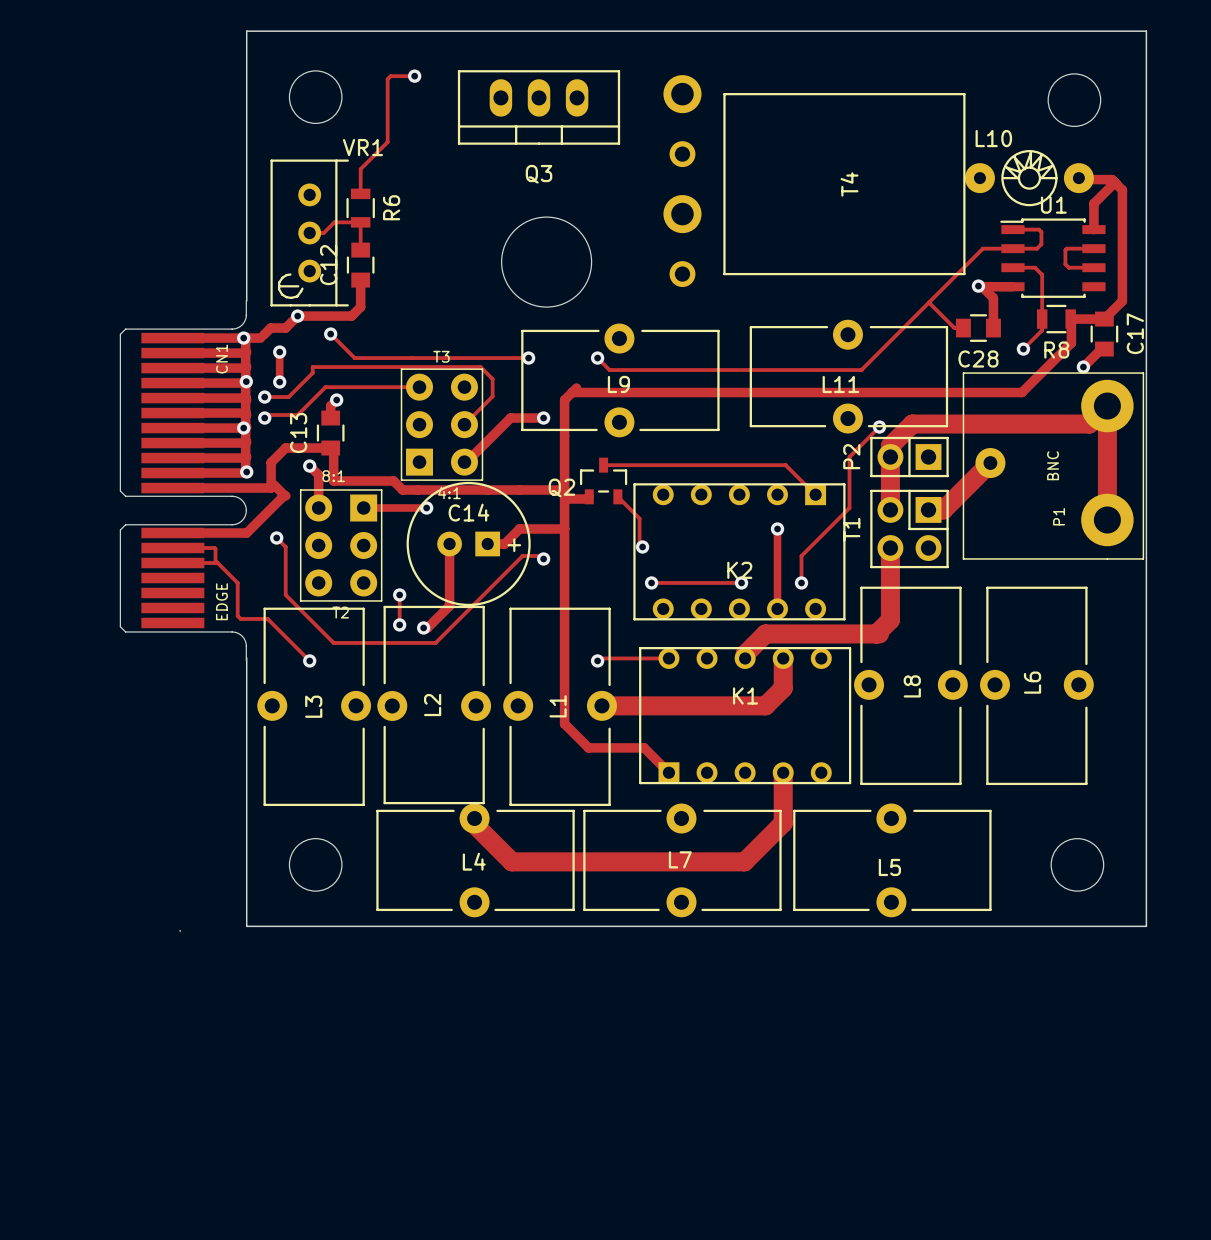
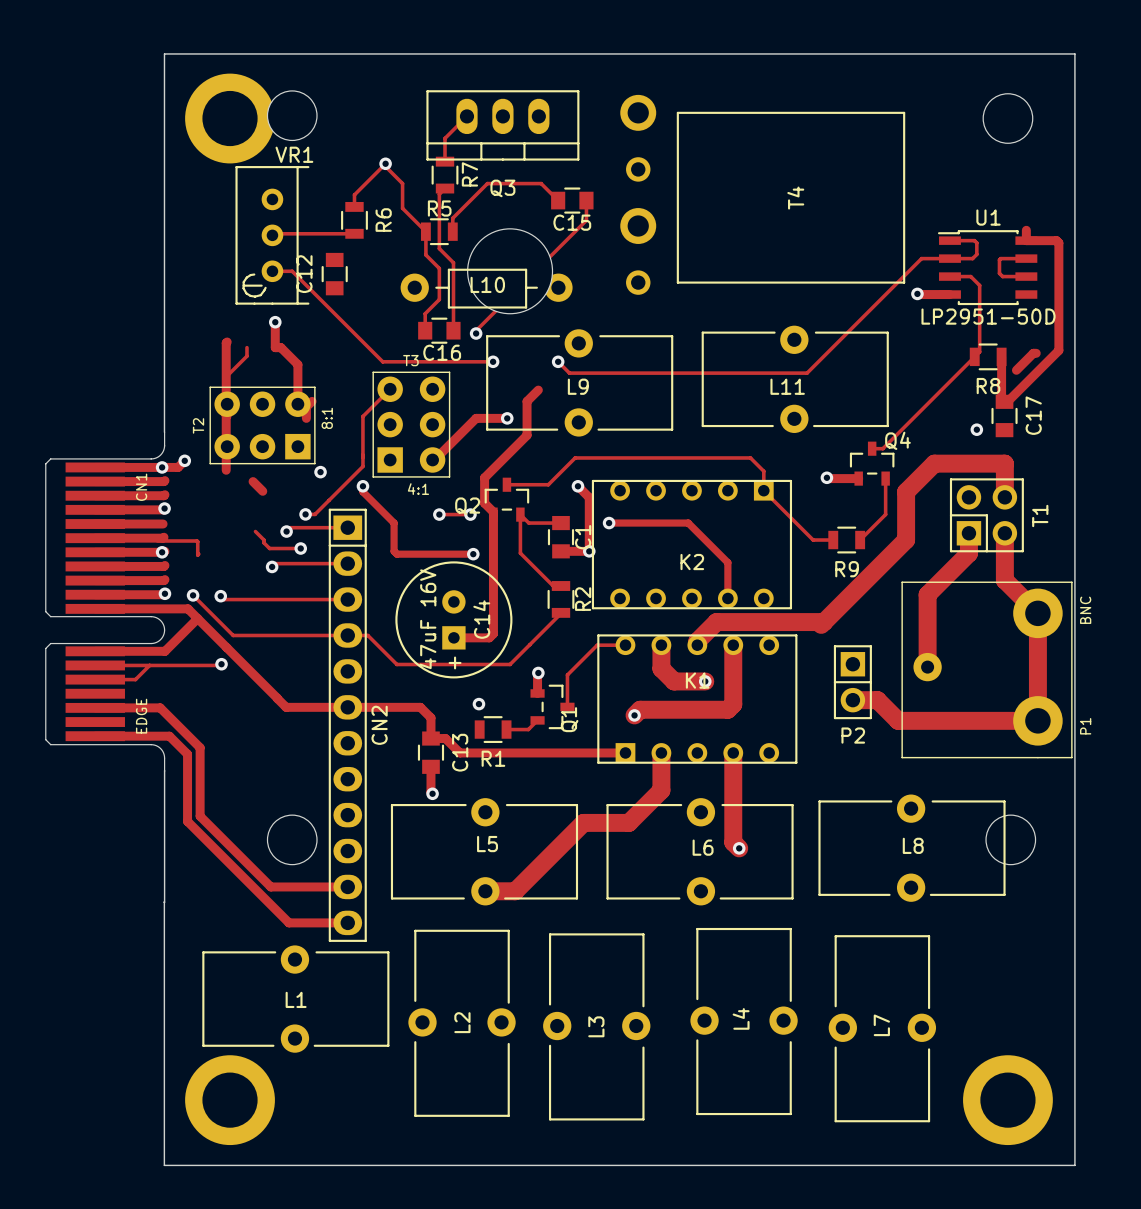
track: (414, 76) (390, 76) (387, 79) (387, 142) (360, 169) (360, 193) -> none
via position: (414, 76) -> (385, 163)
track: none -> (466, 116) (445, 138) (445, 161)
part: none -> (230, 118)
L10 name position: L10 (993, 138) -> L10 (487, 284)
VR1 name position: VR1 (362, 147) -> VR1 (294, 154)
L10 footprint: [964, 149, 1094, 207] -> [400, 268, 573, 309]
R7: none -> (445, 175)
track: none -> (445, 188) (439, 194) (439, 248) (453, 262) (453, 330)
track: (1078, 178) (1111, 179) (1122, 190) (1122, 301) (1104, 319) (1070, 319) (1071, 343) (1021, 392) (572, 392) -> none
track: (1116, 184) (1113, 184) (1093, 203) (1093, 218) -> none
track: none -> (558, 200) (541, 183) (487, 183) (452, 218) (452, 231)
C15: none -> (572, 200)
track: none -> (586, 200) (586, 220) (476, 330) (476, 333)
track: none -> (354, 206) (354, 194) (385, 163) (385, 166) (402, 183) (402, 208) (425, 231) (425, 255) (439, 268) (439, 299) (425, 313) (425, 330)
R6 position: (360, 208) -> (354, 220)
R5: none -> (439, 231)
track: (334, 222) (323, 233) (309, 233) -> (309, 233) (272, 235)
track: (360, 222) (360, 250) -> (334, 233) (354, 233)
track: none -> (1026, 240) (1056, 240) (1058, 242) (1058, 350) (1007, 401) (1001, 398) (1001, 356)
VR1 position: (309, 233) -> (272, 235)
track: (1042, 274) (1042, 330) (1023, 349) -> (977, 283) (979, 285) (979, 351) (882, 448) (872, 448)
track: (360, 280) (360, 307) (351, 316) (297, 316) (285, 328) (270, 328) (263, 335) -> none
track: (978, 286) (981, 286) (993, 298) (993, 328) -> none
board edge: (246, 301) (246, 31) (1146, 31) (1146, 926) (246, 926) (246, 657) -> none
track: (928, 302) (954, 328) (963, 328) -> none
U1 value: none -> LP2951-50D (988, 316)
track: none -> (275, 322) (275, 347) (280, 347) (297, 364) (297, 404)
R8 position: (1056, 319) -> (988, 356)
C16: none -> (439, 330)
via: none -> (476, 333)
C28: (978, 328) -> none
track: (330, 334) (354, 358) (411, 358) -> (272, 271) (292, 271) (382, 361)
via: (330, 334) -> none
C17 position: (1104, 334) -> (1004, 415)
track: (172, 338) (260, 338) -> none
via: (243, 338) -> none
track: none -> (246, 347) (246, 356) (227, 375) (227, 404)
via: (1023, 349) -> none
track: (246, 352) (172, 353) -> (164, 480) (95, 481)
track: (279, 352) (279, 382) -> none
via: (279, 352) -> none
track: (246, 367) (172, 368) -> (164, 494) (95, 495)
via: (1083, 367) -> none
track: (246, 381) (172, 383) -> (164, 508) (95, 509)
via: (246, 381) -> none
via: (279, 382) -> none
track: (419, 387) (325, 387) (297, 415) (267, 415) (264, 418) -> (390, 389) (362, 416) (362, 466) (315, 514) (305, 514)
track: (264, 397) (288, 397) (312, 373) (312, 367) (480, 367) (492, 379) (492, 396) (464, 424) -> none
via: (264, 397) -> none
track: (172, 398) (244, 398) -> (95, 524) (163, 524)
via: (336, 400) -> none
track: (245, 412) (172, 413) -> (163, 537) (95, 538)
via: (264, 418) -> none
track: (246, 427) (172, 428) -> (164, 551) (95, 552)
track: (879, 427) (849, 457) (849, 508) (801, 555) (801, 582) -> none
via position: (879, 427) -> (826, 477)
via: (243, 428) -> none
via: none -> (976, 429)
board edge: none -> (164, 432) (164, 53) (1074, 53) (1074, 1165) (164, 1165) (164, 901)
C13 name position: C13 (298, 433) -> C13 (460, 752)
C13 position: (330, 433) -> (430, 752)
track: (564, 436) (564, 723) (588, 747) (644, 747) (668, 772) -> (527, 435) (484, 477) (484, 503) (493, 512) (493, 633) (489, 637) (453, 637)
track: (246, 442) (172, 443) -> (164, 565) (95, 566)
track: (173, 457) (246, 457) -> (96, 579) (164, 579)
P2 rotation: 0° (909, 457) -> 90° counterclockwise (852, 682)
P2 position: (909, 457) -> (852, 682)
track: none -> (184, 460) (178, 467) (95, 467)
via: none -> (184, 460)
track: (990, 463) (943, 509) (928, 509) -> none
track: (603, 465) (785, 465) (815, 494) -> none
P1 value position: BNC (1053, 465) -> BNC (1085, 610)
track: (309, 466) (318, 475) (318, 508) -> none
via: (309, 466) -> none
Q4: none -> (872, 463)
P1 position: (1053, 466) -> (987, 669)
via: none -> (162, 467)
track: (246, 472) (172, 473) -> (164, 593) (95, 594)
via: (246, 472) -> none
via: none -> (320, 472)
CN1 position: (183, 480) -> (105, 601)
Q2 position: (603, 481) -> (506, 499)
track: none -> (826, 477) (858, 478)
track: none -> (885, 478) (885, 514) (860, 540)
track: (172, 488) (271, 488) (271, 462) (285, 448) (330, 448) (333, 451) (333, 481) (393, 481) (402, 490) (561, 490) (564, 493) -> none
track: none -> (506, 484) (548, 484) (575, 457) (750, 457) (763, 471) (763, 490) (813, 540) (833, 540)
track: none -> (362, 486) (362, 491) (394, 523) (394, 551) (396, 554) (473, 554)
via: none -> (362, 486)
track: none -> (577, 486) (589, 497) (589, 551) (560, 551)
via: none -> (577, 486)
track: (285, 495) (246, 533) (172, 533) -> none
track: (589, 496) (587, 499) (564, 499) -> none
track: (617, 496) (639, 518) (639, 543) (642, 546) -> none
track: none -> (1004, 497) (1004, 463) (934, 463) (906, 491) (906, 540) (821, 624)
track: (363, 508) (426, 508) -> none
via: (426, 508) -> none
track: (890, 509) (890, 446) (912, 424) (1089, 424) (1107, 406) (1107, 519) -> none
via: none -> (164, 508)
P1 name position: P1 (1059, 516) -> P1 (1085, 726)
via: none -> (305, 514)
track: none -> (439, 514) (470, 514)
via: none -> (439, 514)
via: none -> (470, 514)
track: (564, 528) (519, 528) (504, 543) (487, 543) -> none
track: none -> (560, 523) (528, 523) (520, 514) (520, 553) (553, 585) (560, 585)
via: none -> (609, 523)
via: (777, 528) -> none
T1 rotation: 0° (909, 528) -> 180° (986, 515)
T1 position: (909, 528) -> (986, 515)
track: (777, 529) (777, 570) -> (609, 523) (688, 523) (727, 562)
track: none -> (347, 527) (290, 527) (286, 531)
via: (276, 537) -> none
via: none -> (286, 531)
track: none -> (968, 533) (968, 553) (927, 594) (927, 667)
track: none -> (1004, 533) (1004, 580) (1037, 613) (1037, 720) (898, 720) (877, 700) (852, 700)
track: (449, 543) (449, 605) (427, 627) (423, 627) -> none
C14 rotation: 0° (468, 543) -> 90° clockwise (453, 619)
C14 position: (468, 543) -> (453, 619)
C1: none -> (560, 537)
T2 rotation: 0° (341, 545) -> 90° clockwise (262, 425)
T2 position: (341, 545) -> (262, 425)
via: (642, 546) -> none
R9: none -> (846, 540)
track: (890, 548) (890, 620) (876, 633) -> none
track: (285, 549) (285, 594) (333, 642) (435, 642) (522, 555) (540, 555) (543, 558) -> (263, 542) (269, 548) (300, 548)
via: none -> (300, 548)
via: (543, 558) -> none
via: none -> (589, 551)
via: none -> (162, 552)
via: none -> (473, 554)
track: (172, 563) (217, 563) (237, 582) (237, 615) (240, 618) (267, 618) (309, 660) -> none
track: none -> (347, 563) (275, 563) (272, 566)
via: none -> (272, 566)
track: (651, 582) (741, 582) -> none
via: (651, 582) -> none
via: (741, 582) -> none
via: (801, 582) -> none
track: (399, 594) (399, 624) -> none
via: (399, 594) -> none
via: none -> (164, 593)
track: none -> (193, 595) (233, 635) (367, 635) (396, 664) (510, 664) (560, 612)
via: none -> (193, 595)
track: none -> (220, 596) (224, 599) (347, 599)
via: none -> (220, 596)
R2: none -> (560, 599)
track: none -> (95, 608) (187, 608) (277, 698)
via: (399, 624) -> none
via: (423, 627) -> none
track: none -> (197, 618) (165, 651) (95, 651)
C14 value: none -> 47uF 16V (427, 619)
track: (639, 658) (600, 658) (597, 660) -> (597, 645) (567, 675) (567, 706)
track: none -> (661, 645) (661, 668) (674, 681) (705, 681)
via: (309, 660) -> none
via position: (597, 660) -> (538, 672)
track: none -> (221, 664) (95, 665)
via: none -> (221, 664)
track: none -> (149, 665) (135, 679) (95, 679)
L8 rotation: 0° (910, 685) -> 90° counterclockwise (912, 848)
L8 position: (910, 685) -> (912, 848)
L6 rotation: 0° (1036, 685) -> 90° clockwise (700, 851)
L6 position: (1036, 685) -> (700, 851)
track: none -> (538, 672) (537, 693)
track: (783, 688) (765, 705) (601, 705) -> (733, 673) (733, 704) (727, 709) (640, 709) (634, 715)
via: none -> (705, 681)
L2 rotation: 0° (434, 705) -> 180° (462, 1023)
L2 position: (434, 705) -> (462, 1023)
L3 position: (314, 706) -> (596, 1026)
L1 rotation: 0° (560, 706) -> 90° counterclockwise (295, 999)
L1 position: (560, 706) -> (295, 999)
track: none -> (277, 698) (286, 707) (420, 707) (430, 717) (430, 738) (445, 738) (459, 752) (625, 752)
via: none -> (478, 704)
Q1: none -> (552, 706)
track: none -> (95, 707) (160, 707) (200, 747) (200, 816) (270, 886) (347, 886)
via: none -> (634, 715)
track: none -> (537, 720) (528, 729) (506, 729)
CN2: none -> (347, 725)
R1: none -> (493, 729)
track: none -> (95, 736) (169, 736) (187, 754) (187, 821) (289, 922) (347, 922)
track: none -> (661, 752) (661, 790) (628, 822) (583, 822) (515, 891) (485, 891)
track: none -> (430, 766) (432, 793)
board edge: none -> (164, 770) (164, 902)
via: none -> (432, 793)
track: (783, 823) (744, 861) (511, 861) (474, 824) -> (733, 800) (733, 842) (739, 848)
L4 rotation: 0° (475, 860) -> 90° clockwise (744, 1021)
L4 position: (475, 860) -> (744, 1021)
L7 rotation: 0° (682, 860) -> 90° clockwise (882, 1028)
L7 position: (682, 860) -> (882, 1028)
L5 rotation: 0° (892, 860) -> 180° (484, 851)
L5 position: (892, 860) -> (484, 851)
via: none -> (739, 848)
part: none -> (230, 1100)
part: none -> (1007, 1100)

